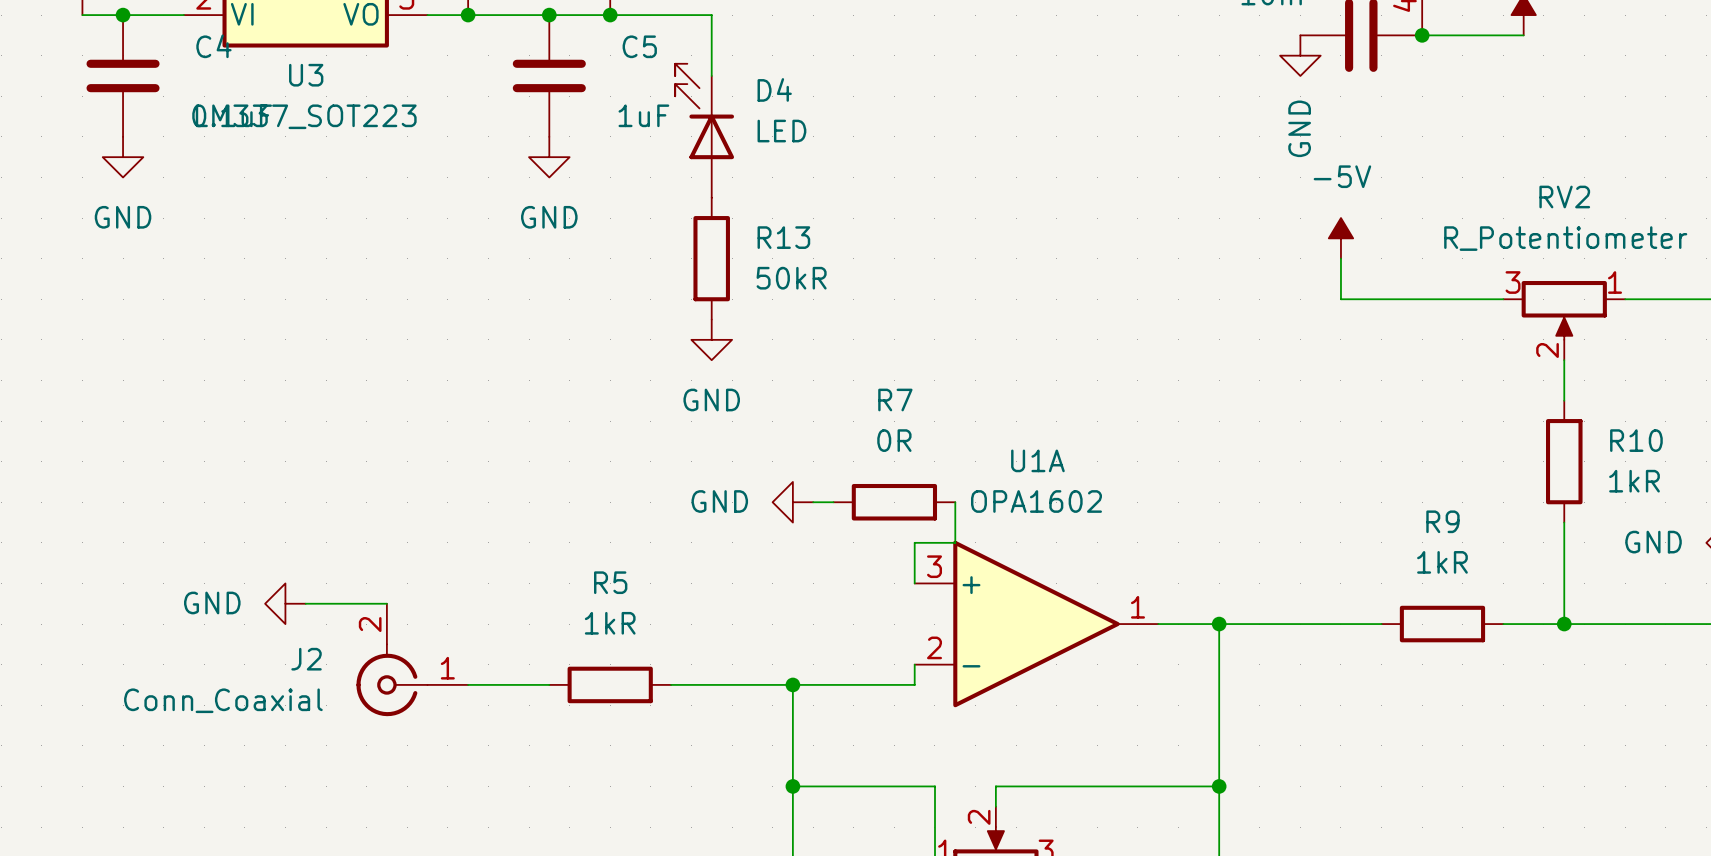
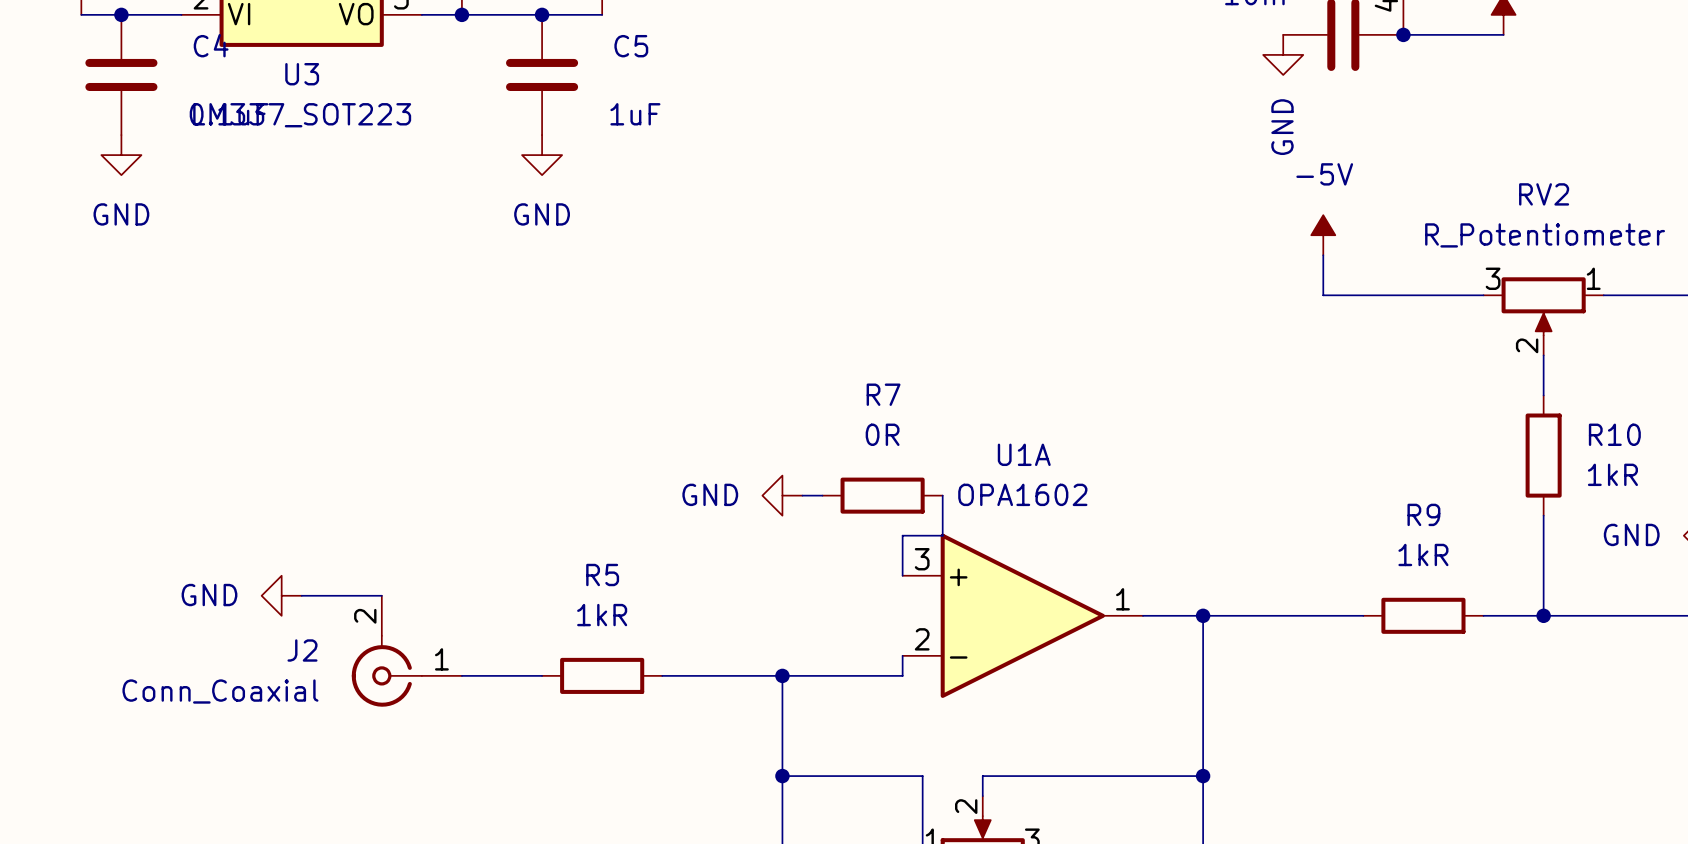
wire: (610, 15) (711, 15) (711, 75) -> none
junction: (610, 15) -> none
D4: LED (704, 130) -> none
R13: 50kR (711, 258) -> none
power symbol: GND (711, 339) -> none

